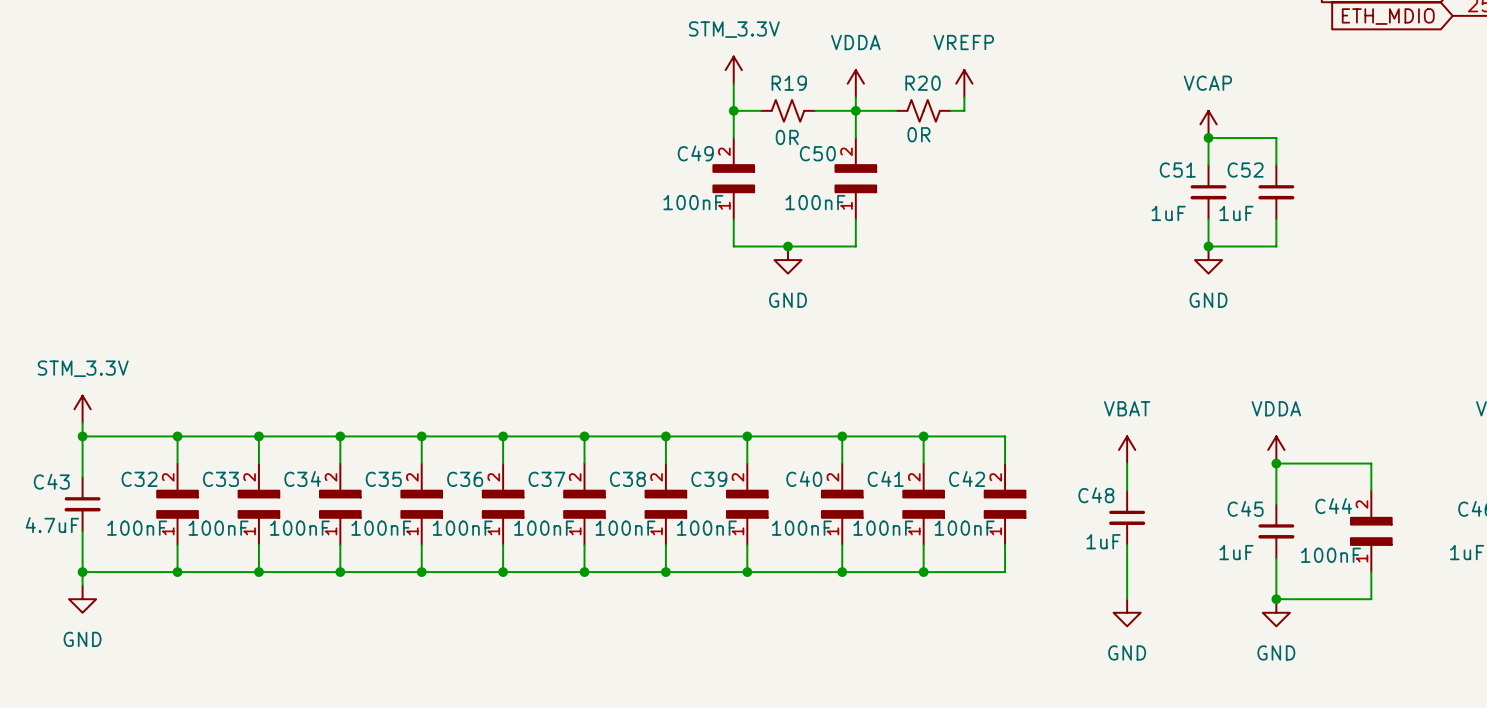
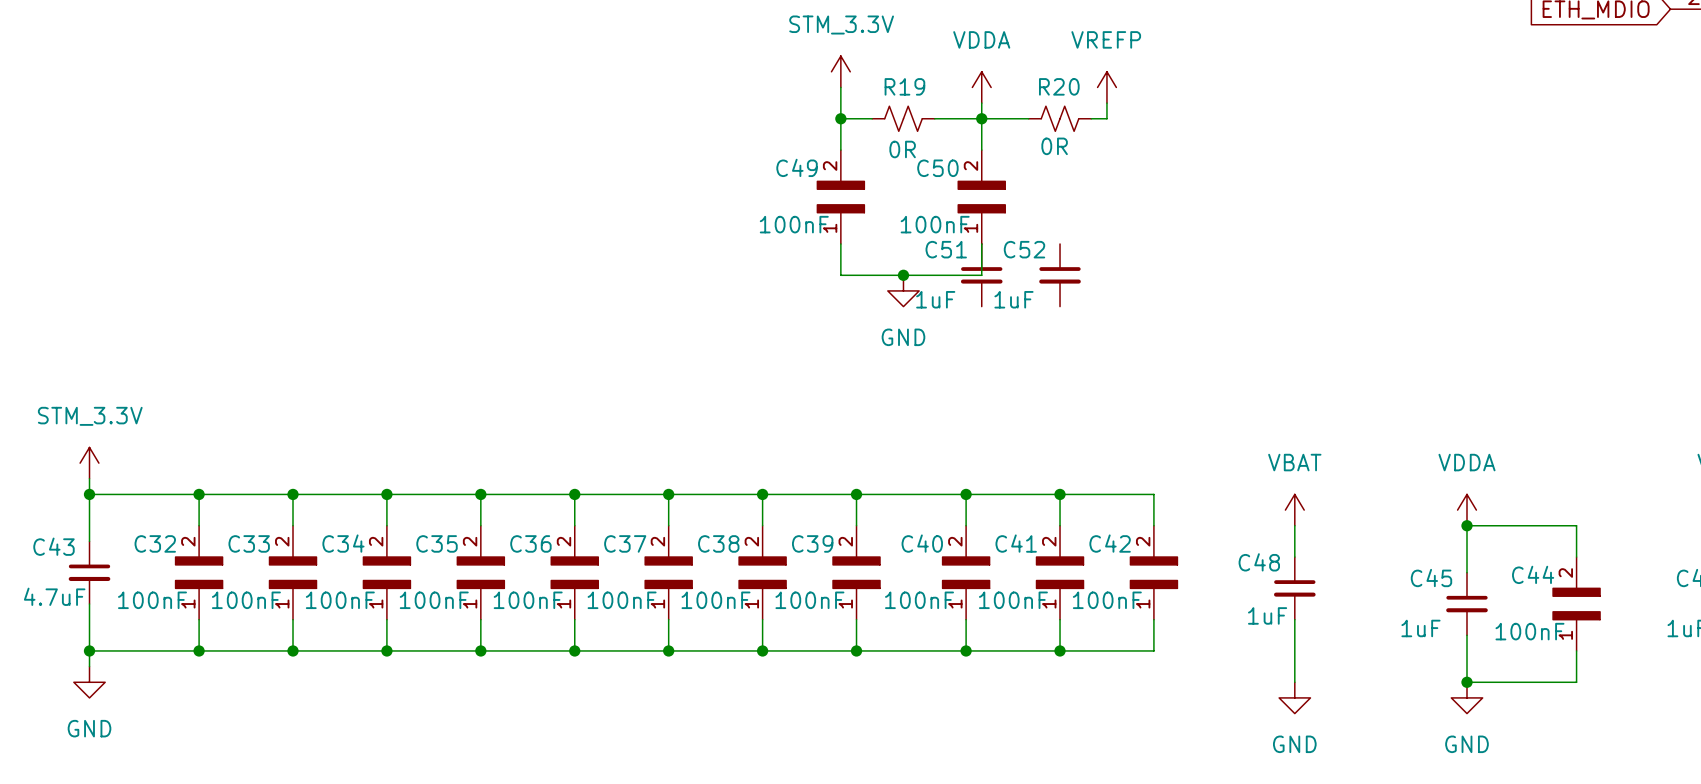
power symbol: VCAP (1208, 124) -> none
junction: (1208, 137) -> none
wire: (1208, 165) (1208, 137) (1276, 137) (1276, 165) -> none
C51 position: (1208, 192) -> (981, 275)
C52 position: (1276, 192) -> (1060, 275)
wire: (1208, 219) (1208, 246) (1276, 246) (1276, 219) -> none
junction: (1208, 246) -> none
power symbol: GND (1208, 260) -> none

